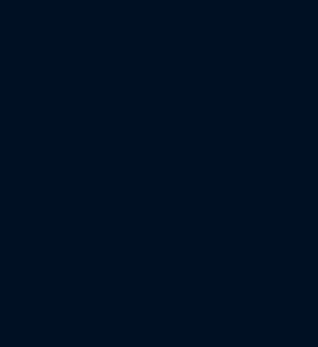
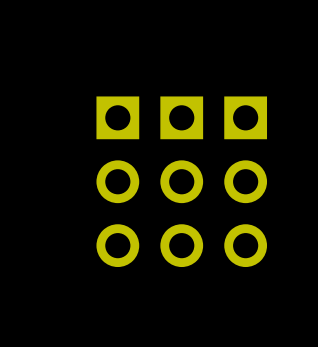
part: none -> (117, 181)
part: none -> (181, 181)
part: none -> (245, 181)

